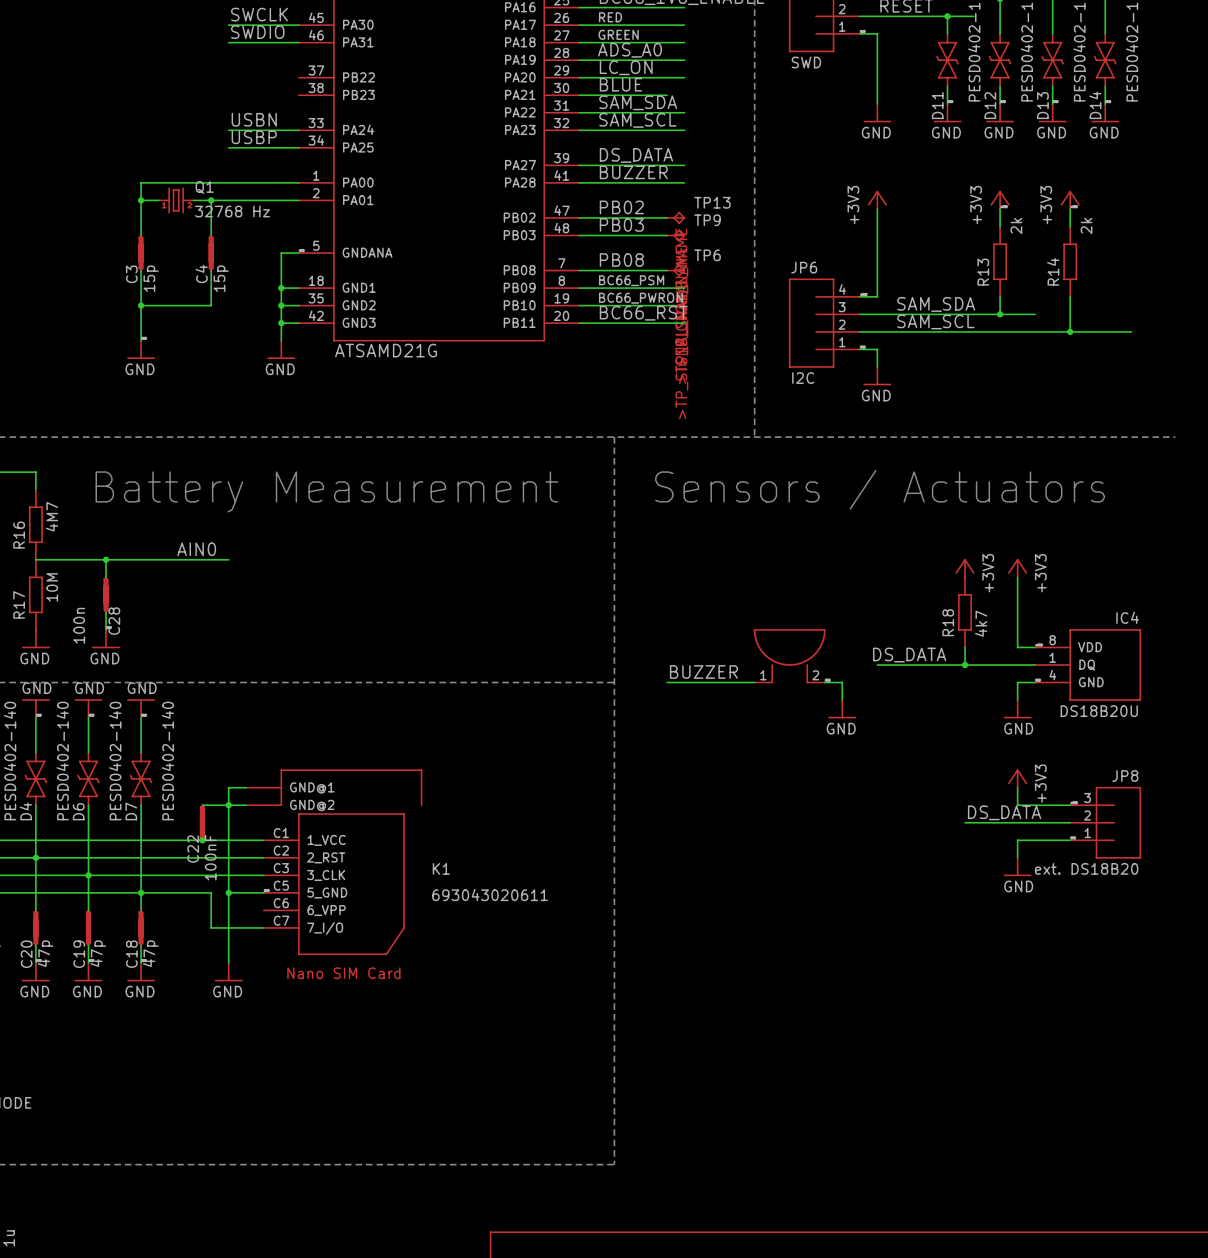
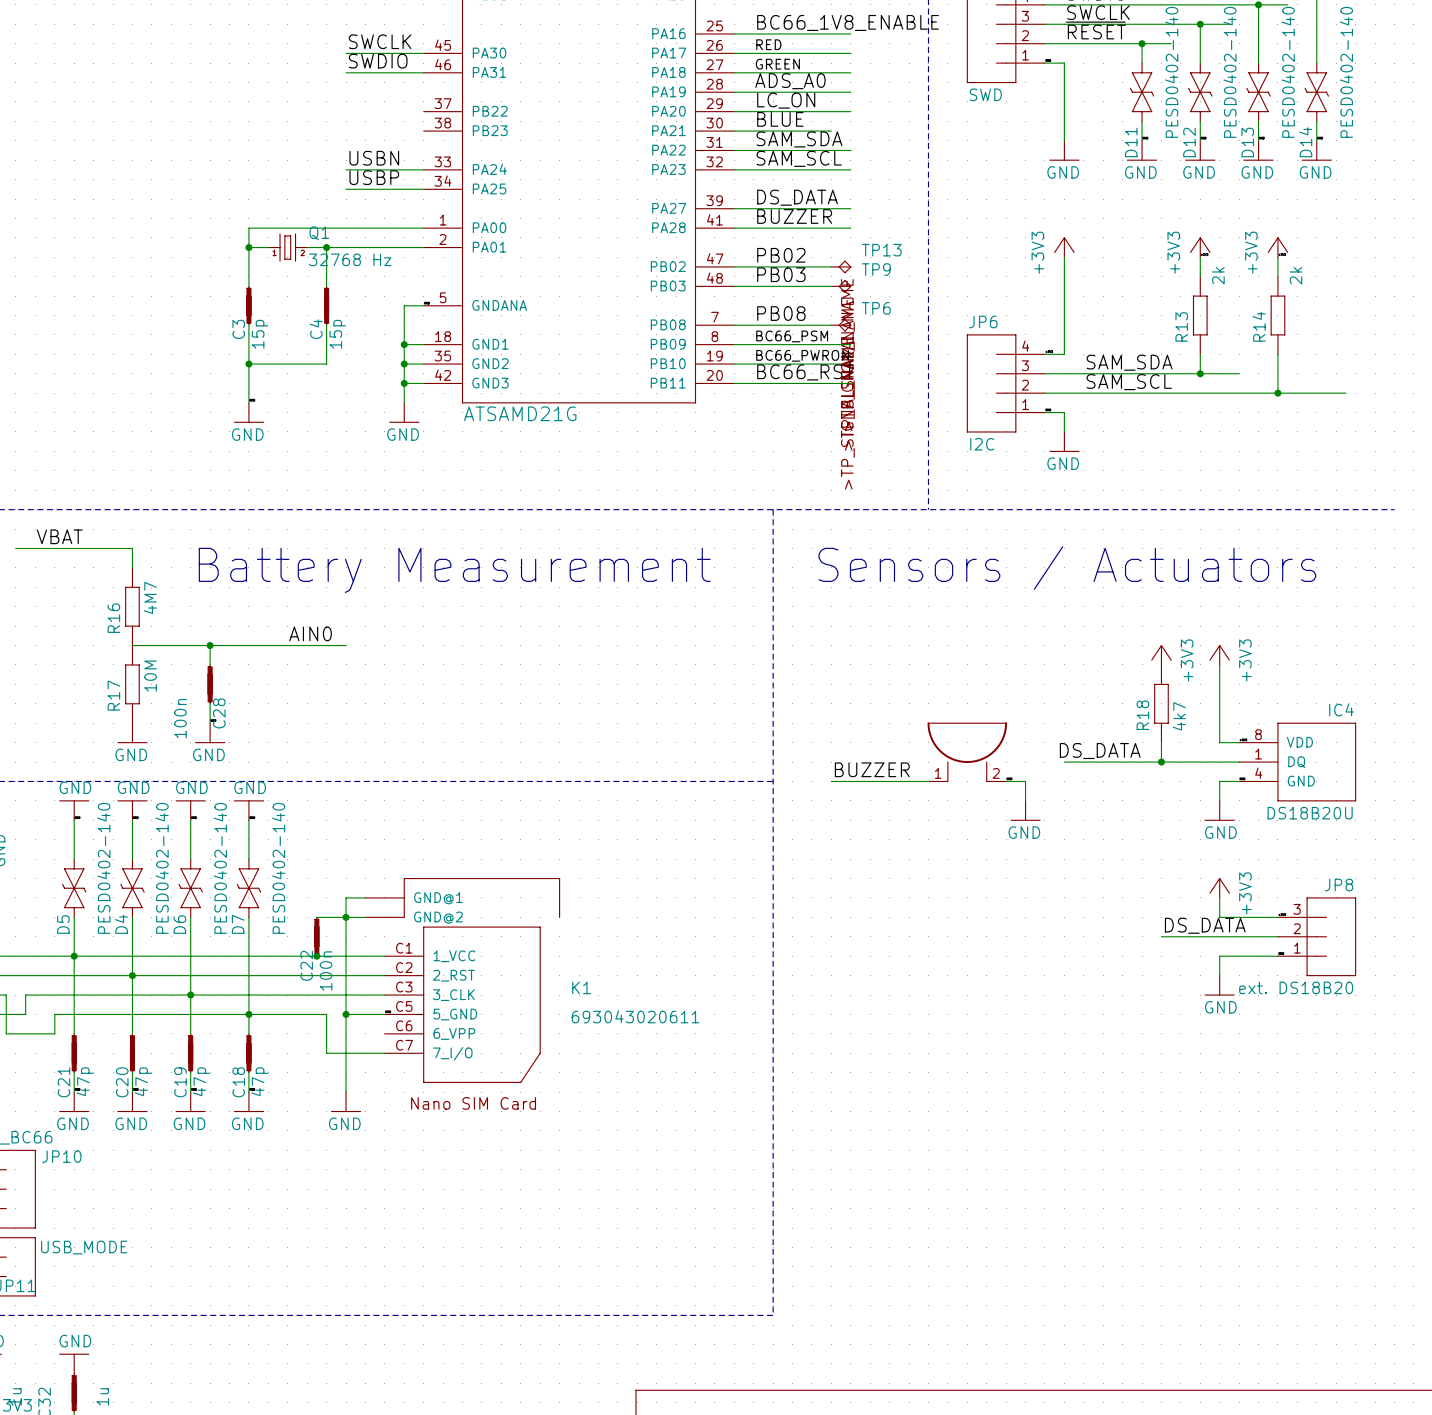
C22 value: 100nF (210, 857) -> 100n (326, 971)

